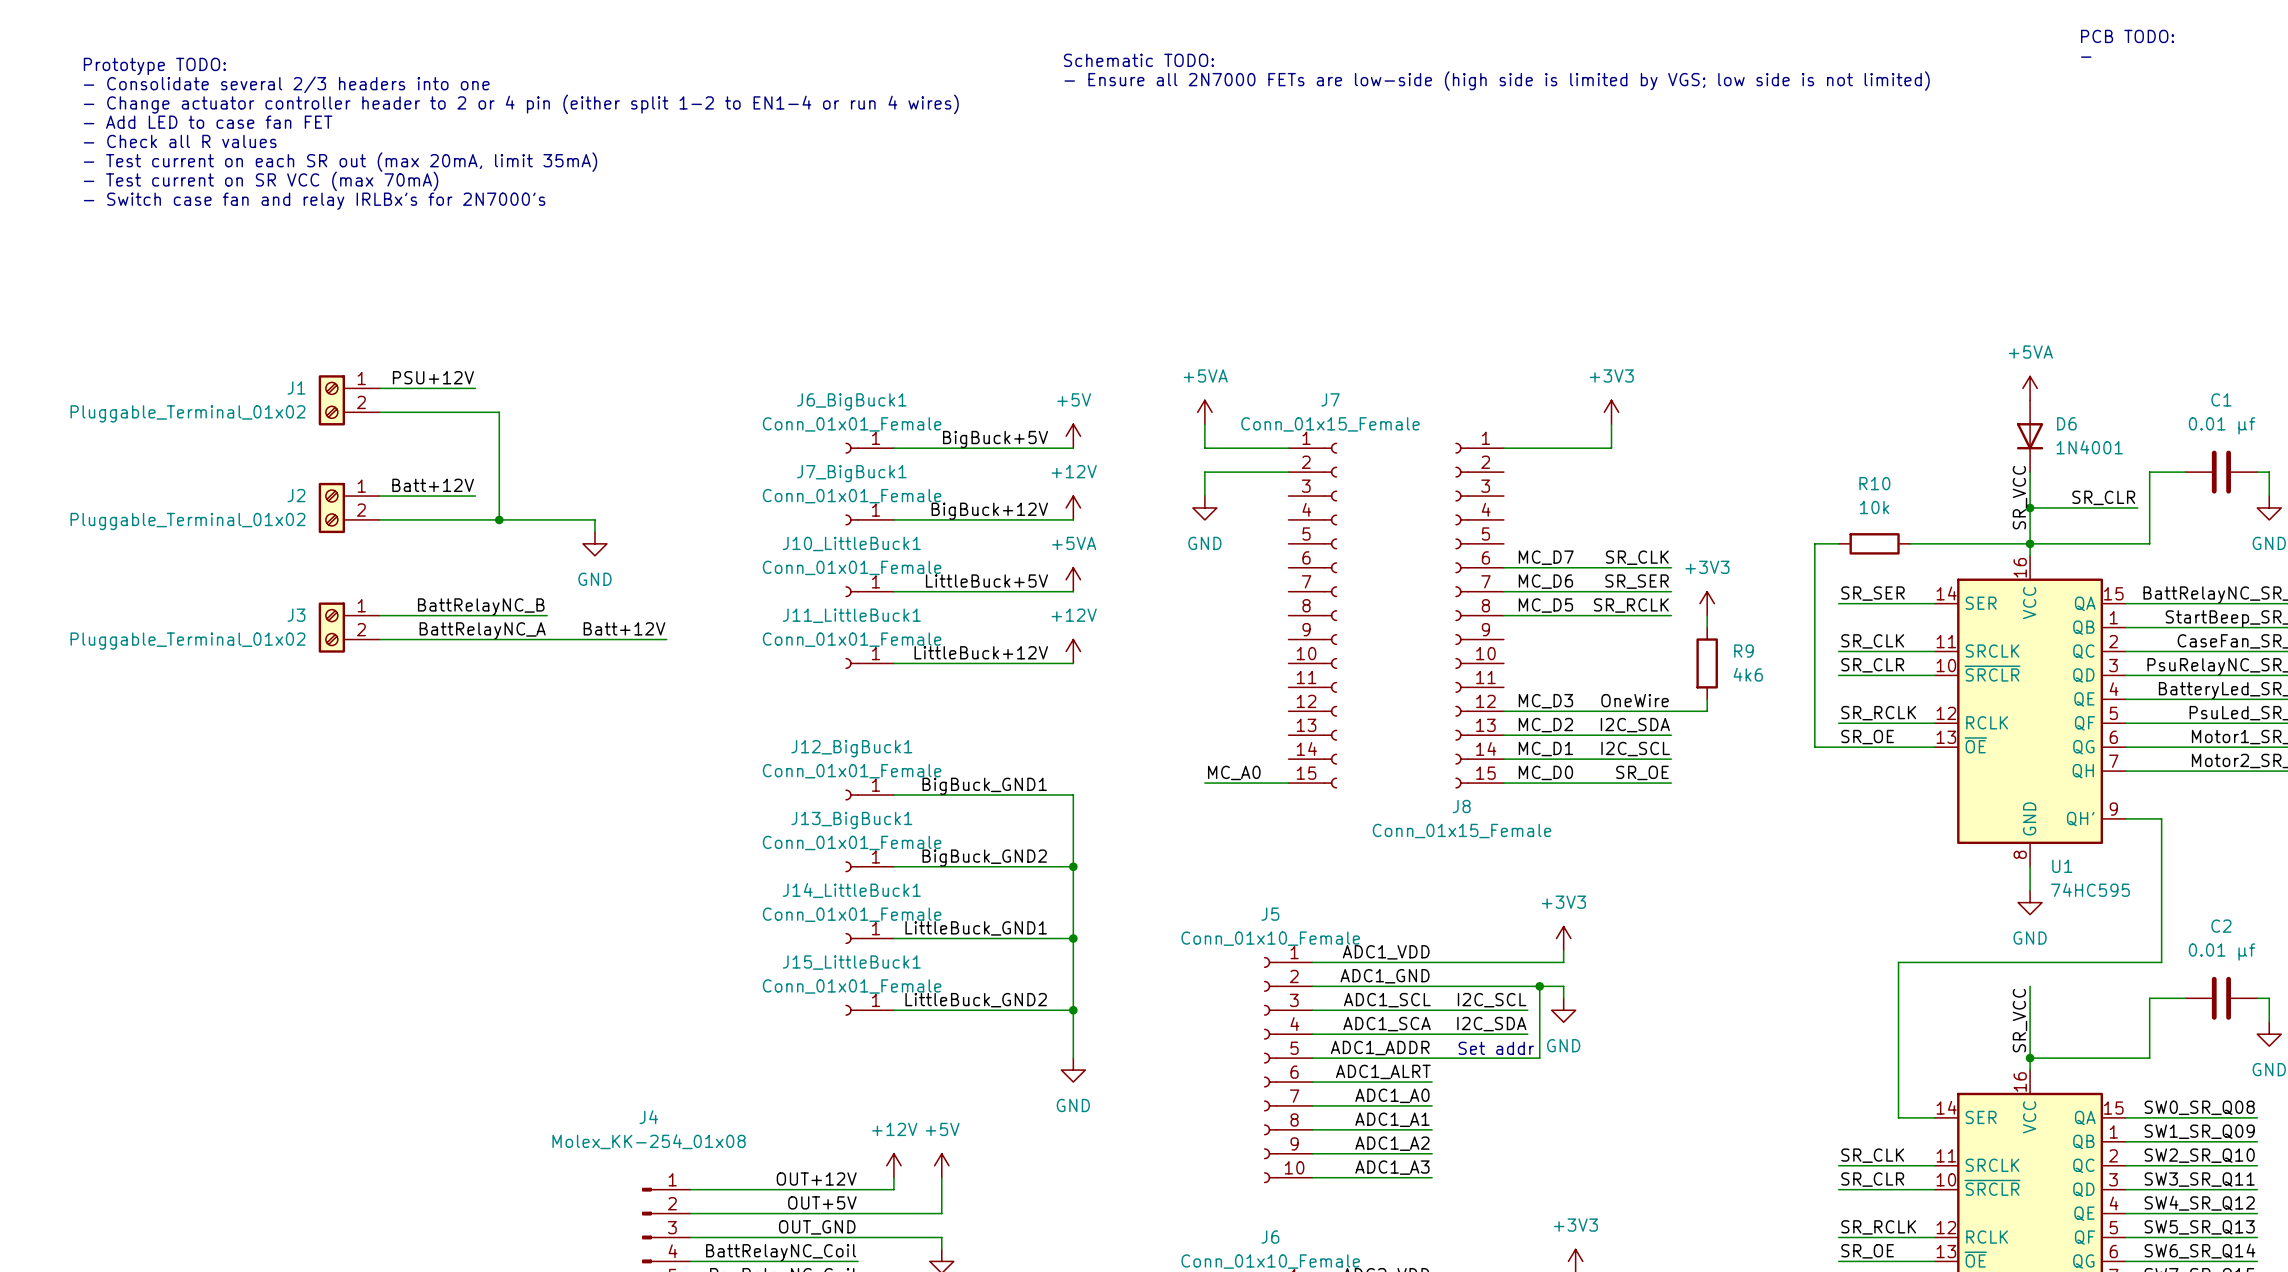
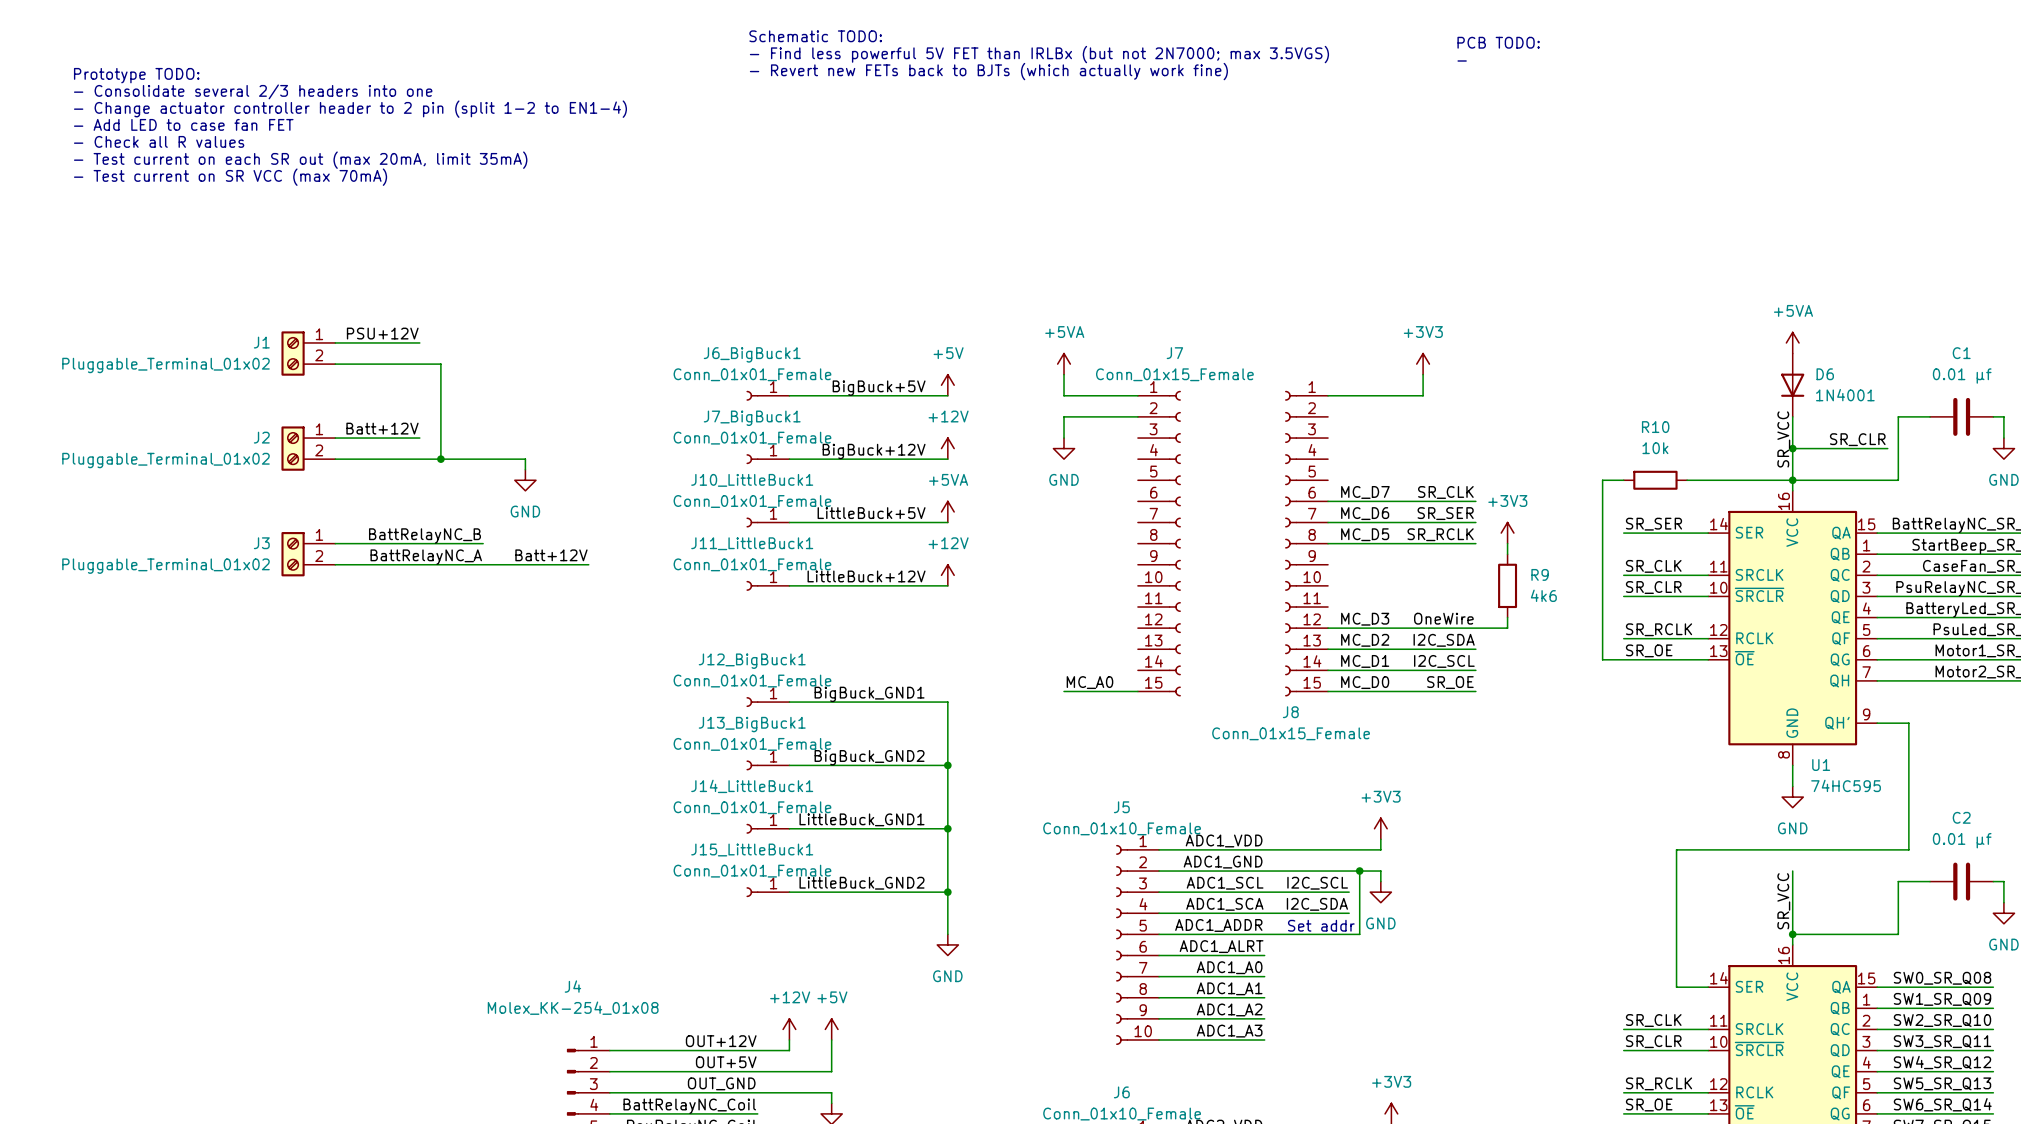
text: PCB TODO: (2127, 36) -> none
text: none -> PCB TODO: (1498, 42)
text: - (2086, 57) -> none
text position: Schematic TODO: (1138, 60) -> Schematic TODO: (815, 36)
text: none -> - Find less powerful 5V FET than IRLBx (but not 2N7000; max 3.5VGS) (1039, 54)
text: Prototype TODO: (154, 66) -> none
text: none -> - (1462, 60)
text: none -> - Revert new FETs back to BJTs (which actually work fine) (988, 71)
text: - Ensure all 2N7000 FETs are low-side (high side is limited by VGS; low side is not limited) (1497, 81) -> none
text: - Consolidate several 2/3 headers into one (286, 84) -> Prototype TODO: (136, 75)
text: - Change actuator controller header to 2 or 4 pin (either split 1-2 to EN1-4 or run 4 wires) (521, 104) -> - Consolidate several 2/3 headers into one (253, 91)
text: - Add LED to case fan FET (208, 122) -> - Change actuator controller header to 2 pin (split 1-2 to EN1-4) (350, 109)
text: - Check all R values (180, 141) -> - Add LED to case fan FET (183, 124)
text: - Test current on each SR out (max 20mA, limit 35mA) (340, 162) -> - Check all R values (159, 141)
text: - Test current on SR VCC (max 70mA) (261, 181) -> - Test current on each SR out (max 20mA, limit 35mA) (300, 160)
text: - Switch case fan and relay IRLBx's for 2N7000's (314, 201) -> - Test current on SR VCC (max 70mA) (230, 177)

